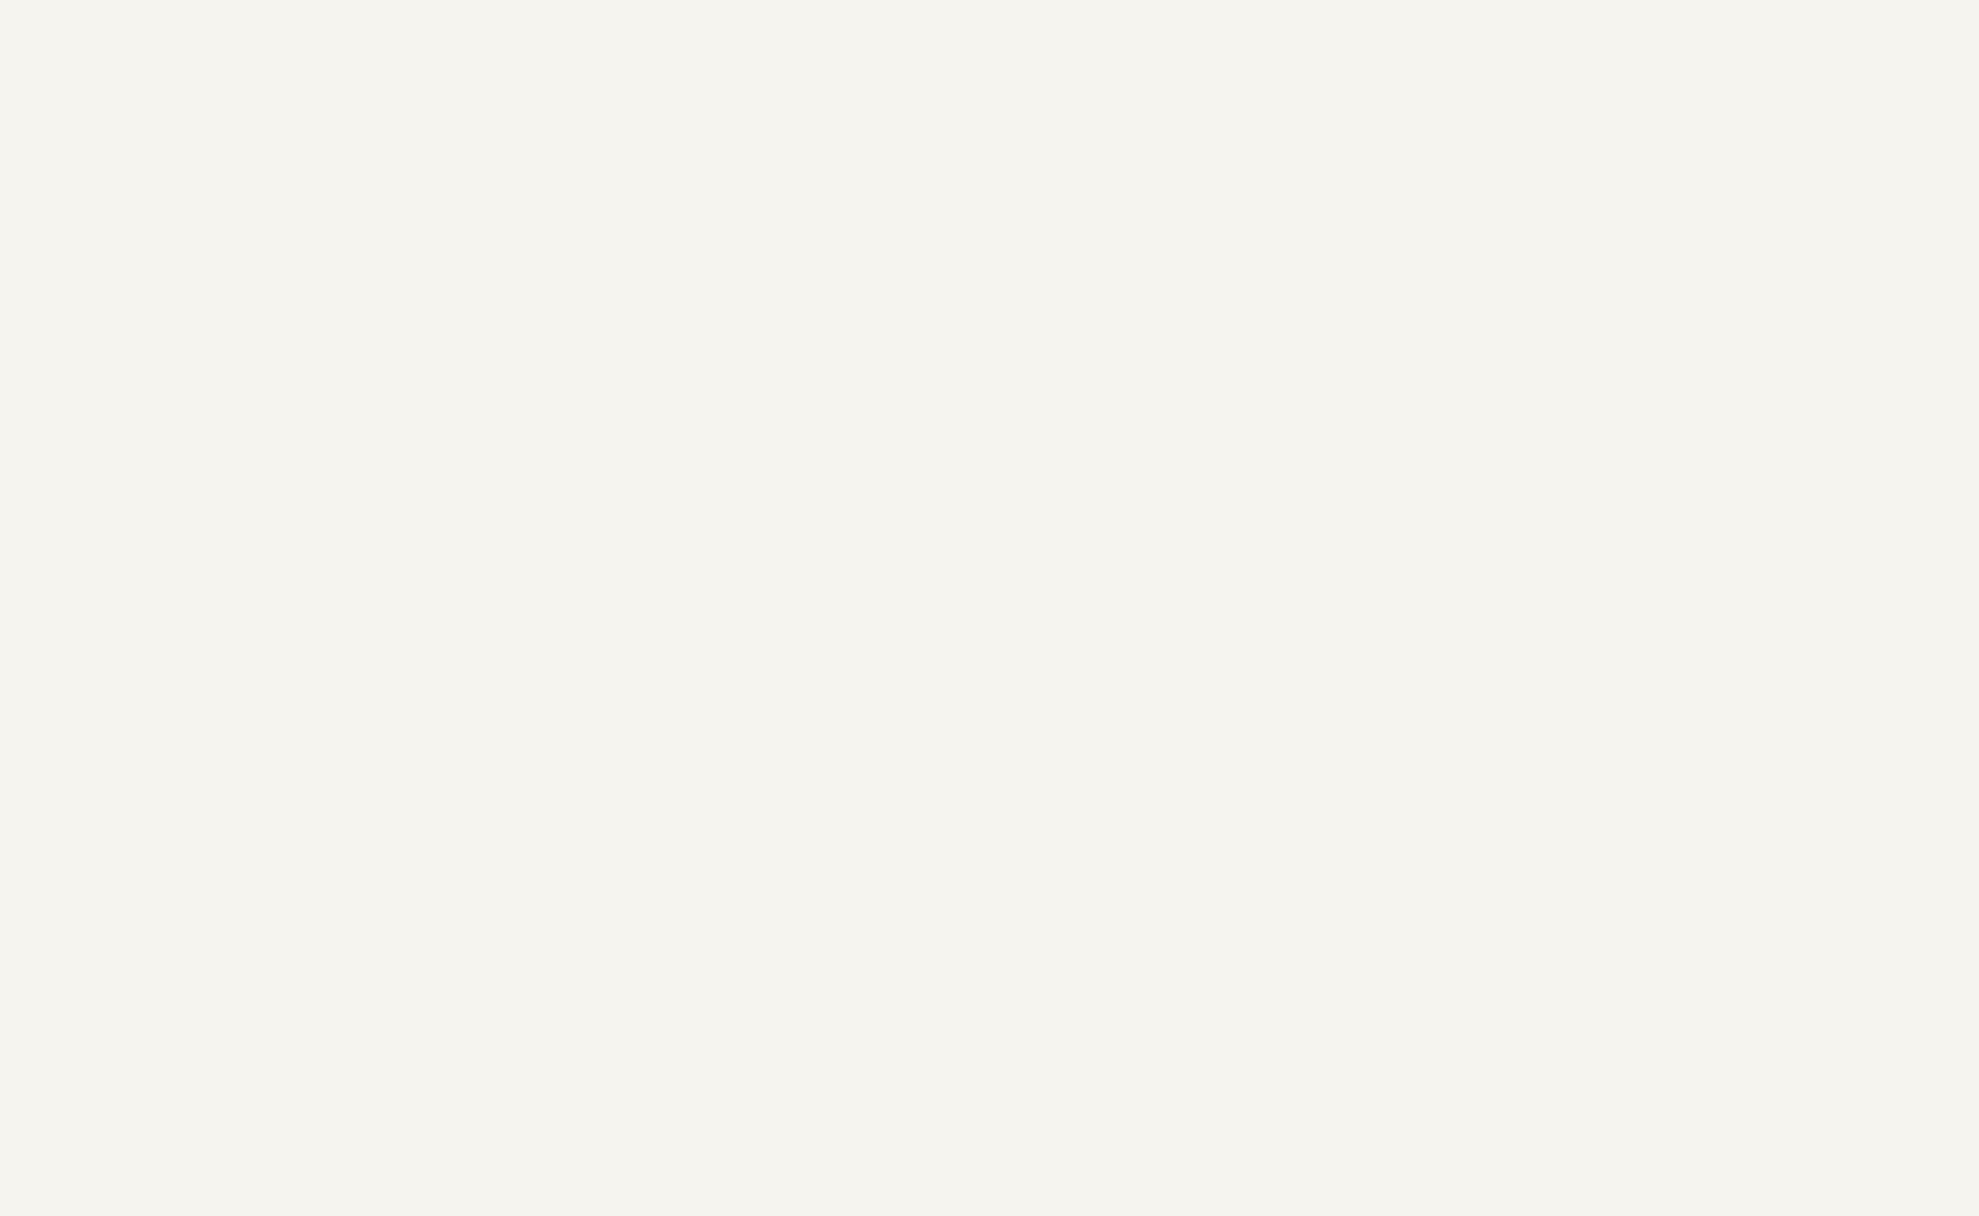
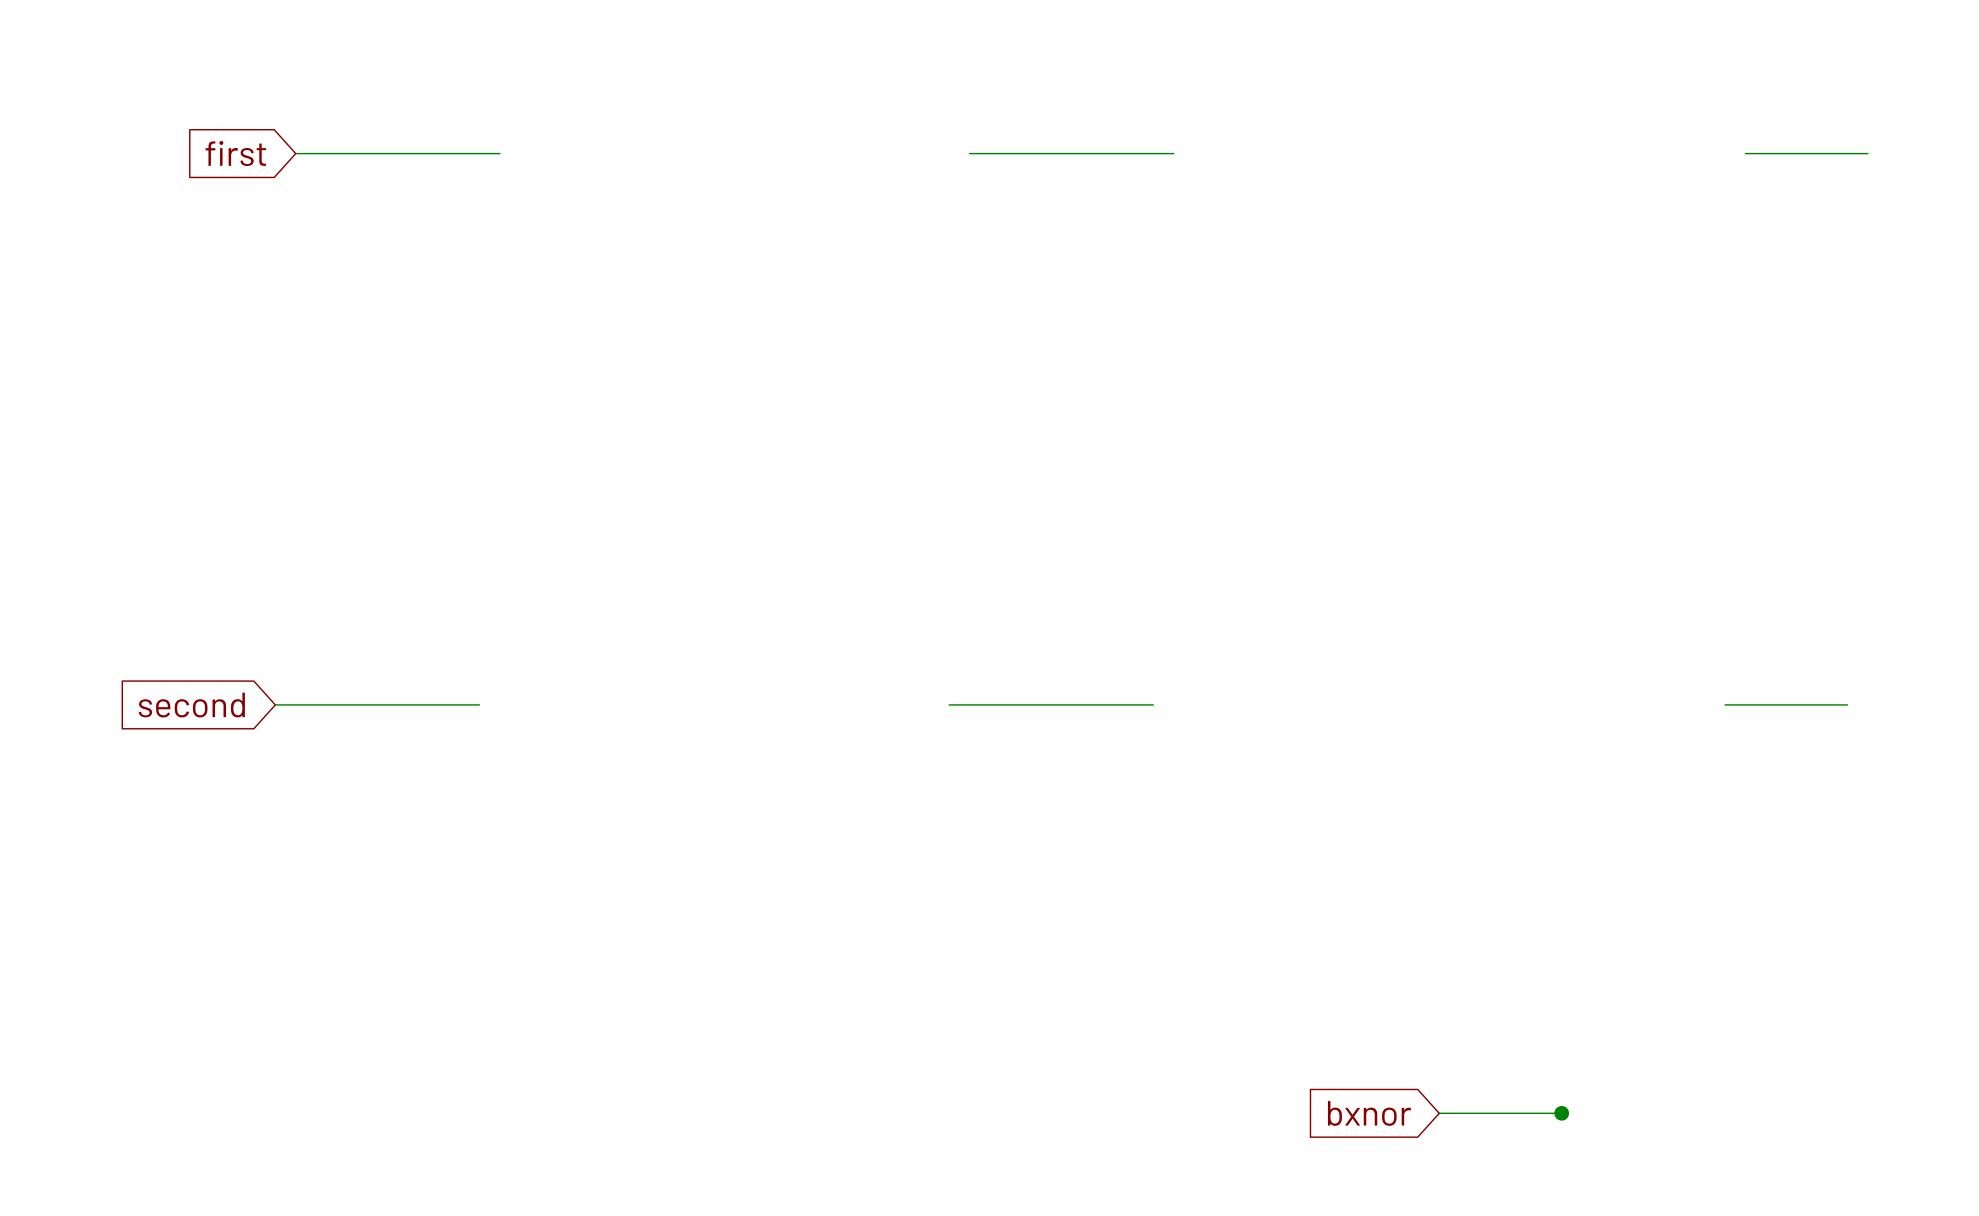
global label: none -> first (235, 153)
wire: none -> (295, 153) (499, 153)
wire: none -> (969, 153) (1173, 153)
wire: none -> (1745, 153) (1868, 153)
global label: none -> second (191, 705)
wire: none -> (275, 704) (479, 704)
wire: none -> (949, 704) (1153, 704)
wire: none -> (1725, 704) (1847, 704)
global label: none -> bxnor (1369, 1113)
wire: none -> (1439, 1113) (1561, 1113)
junction: none -> (1561, 1113)

